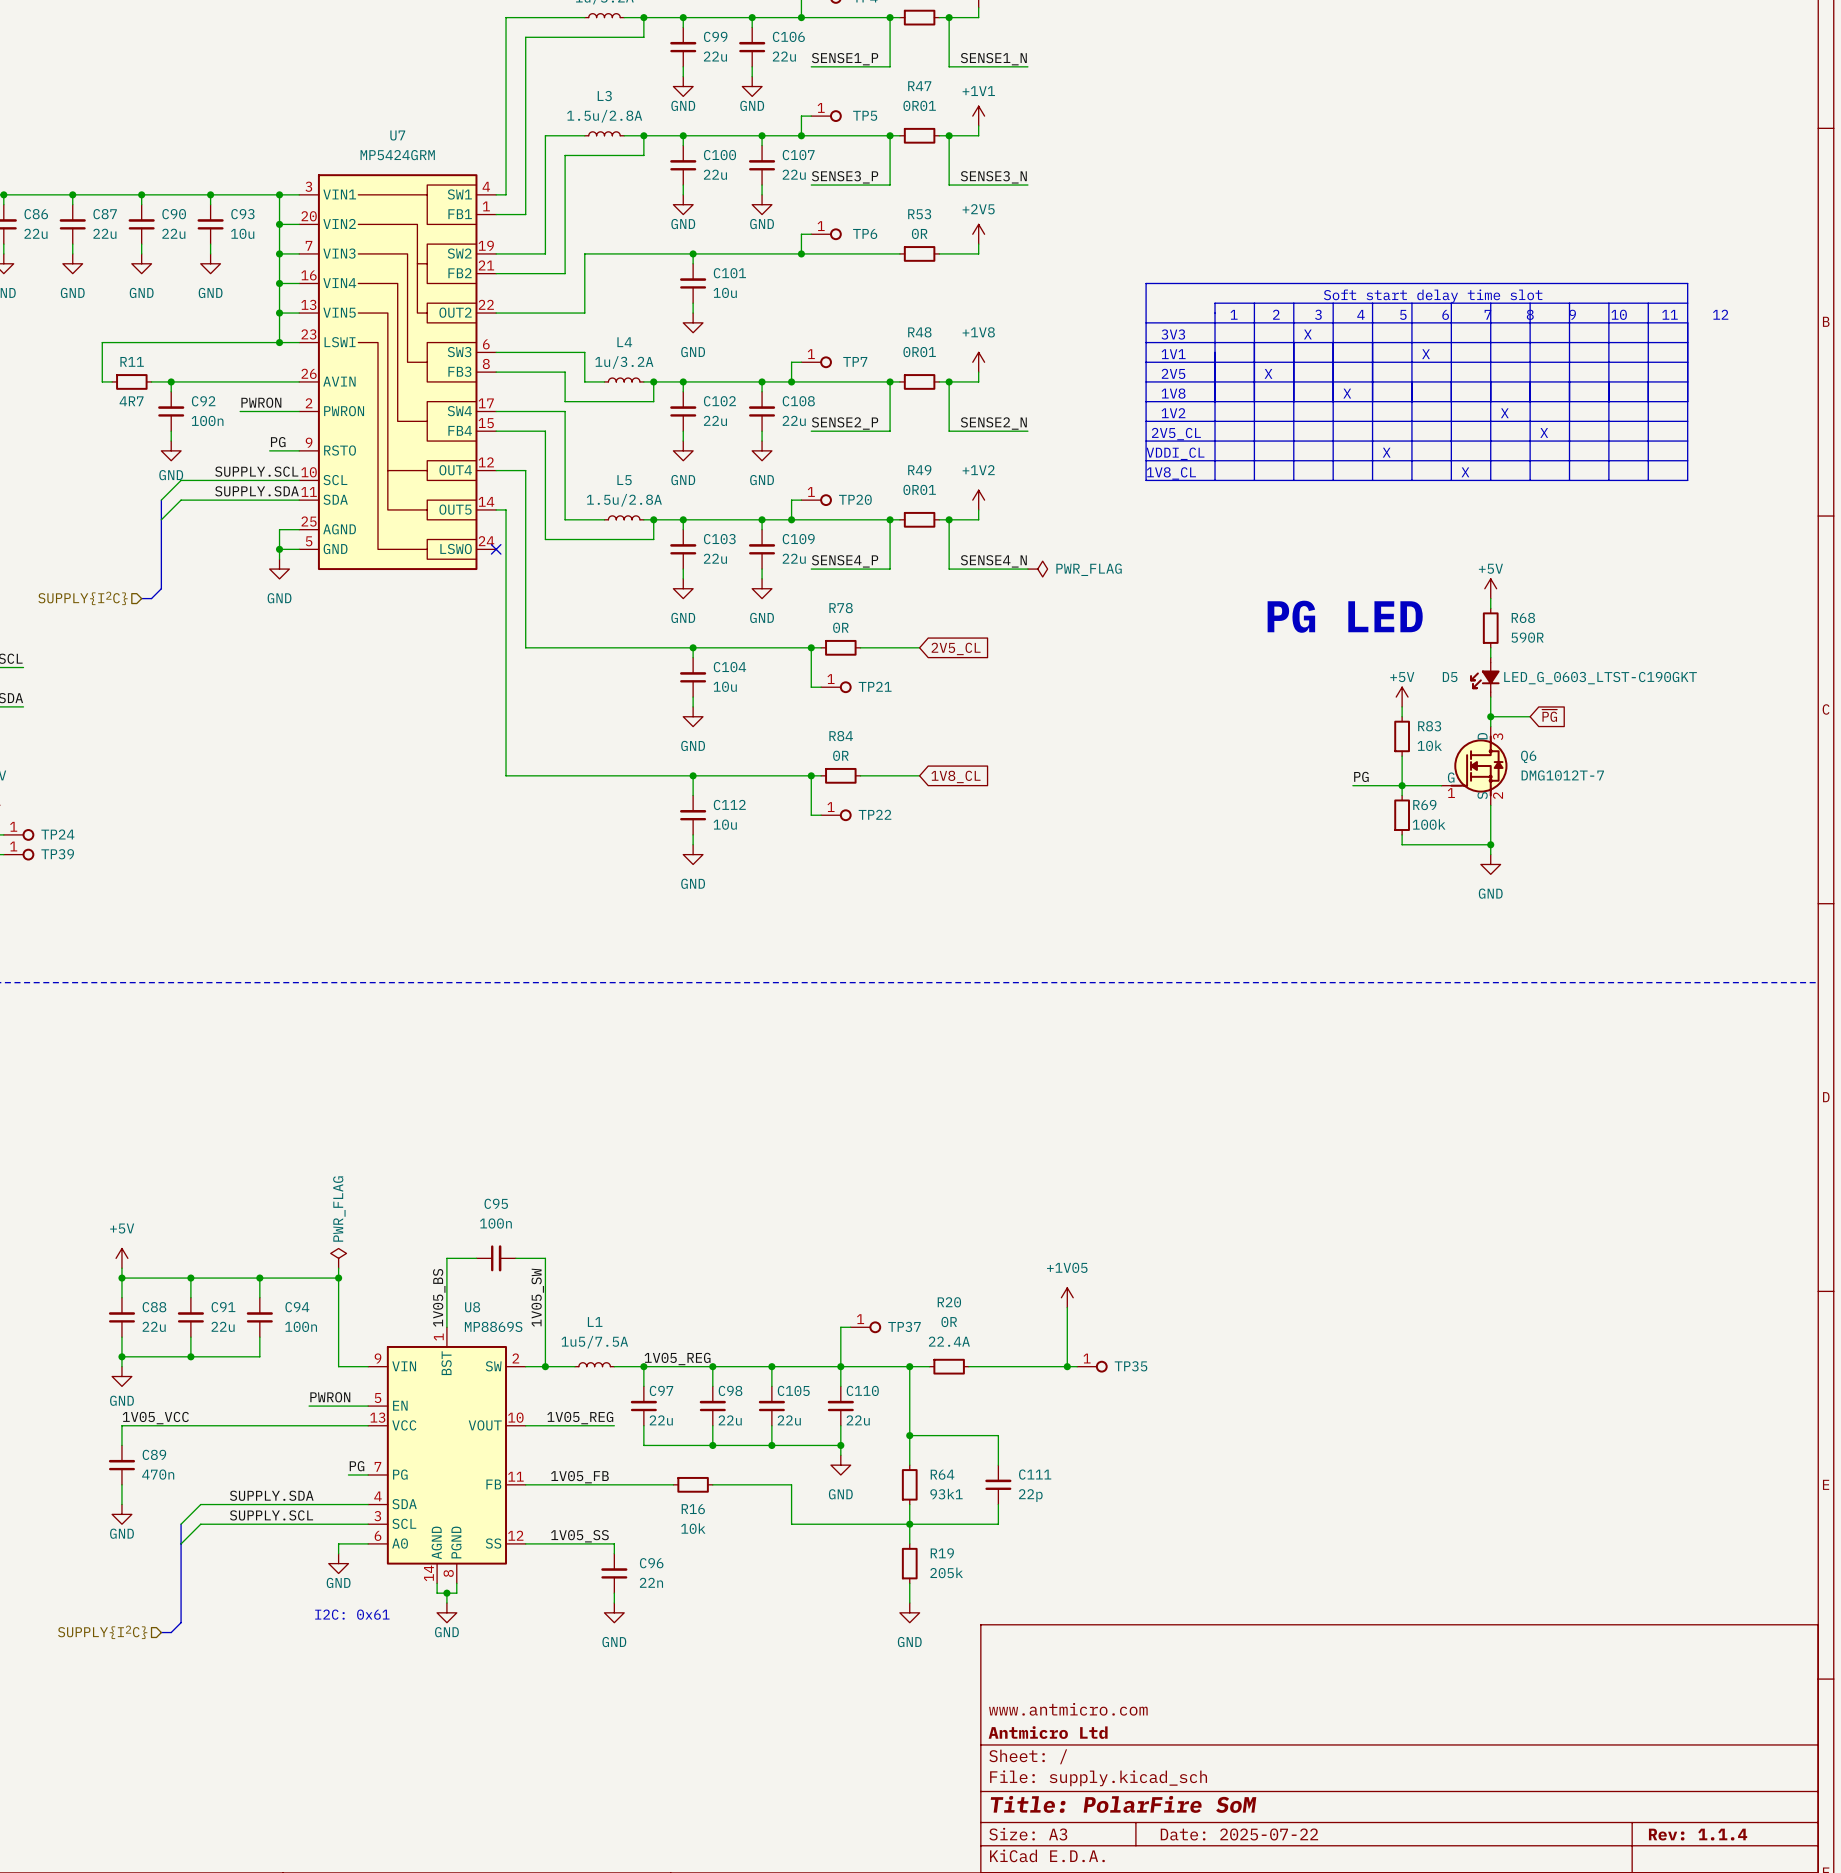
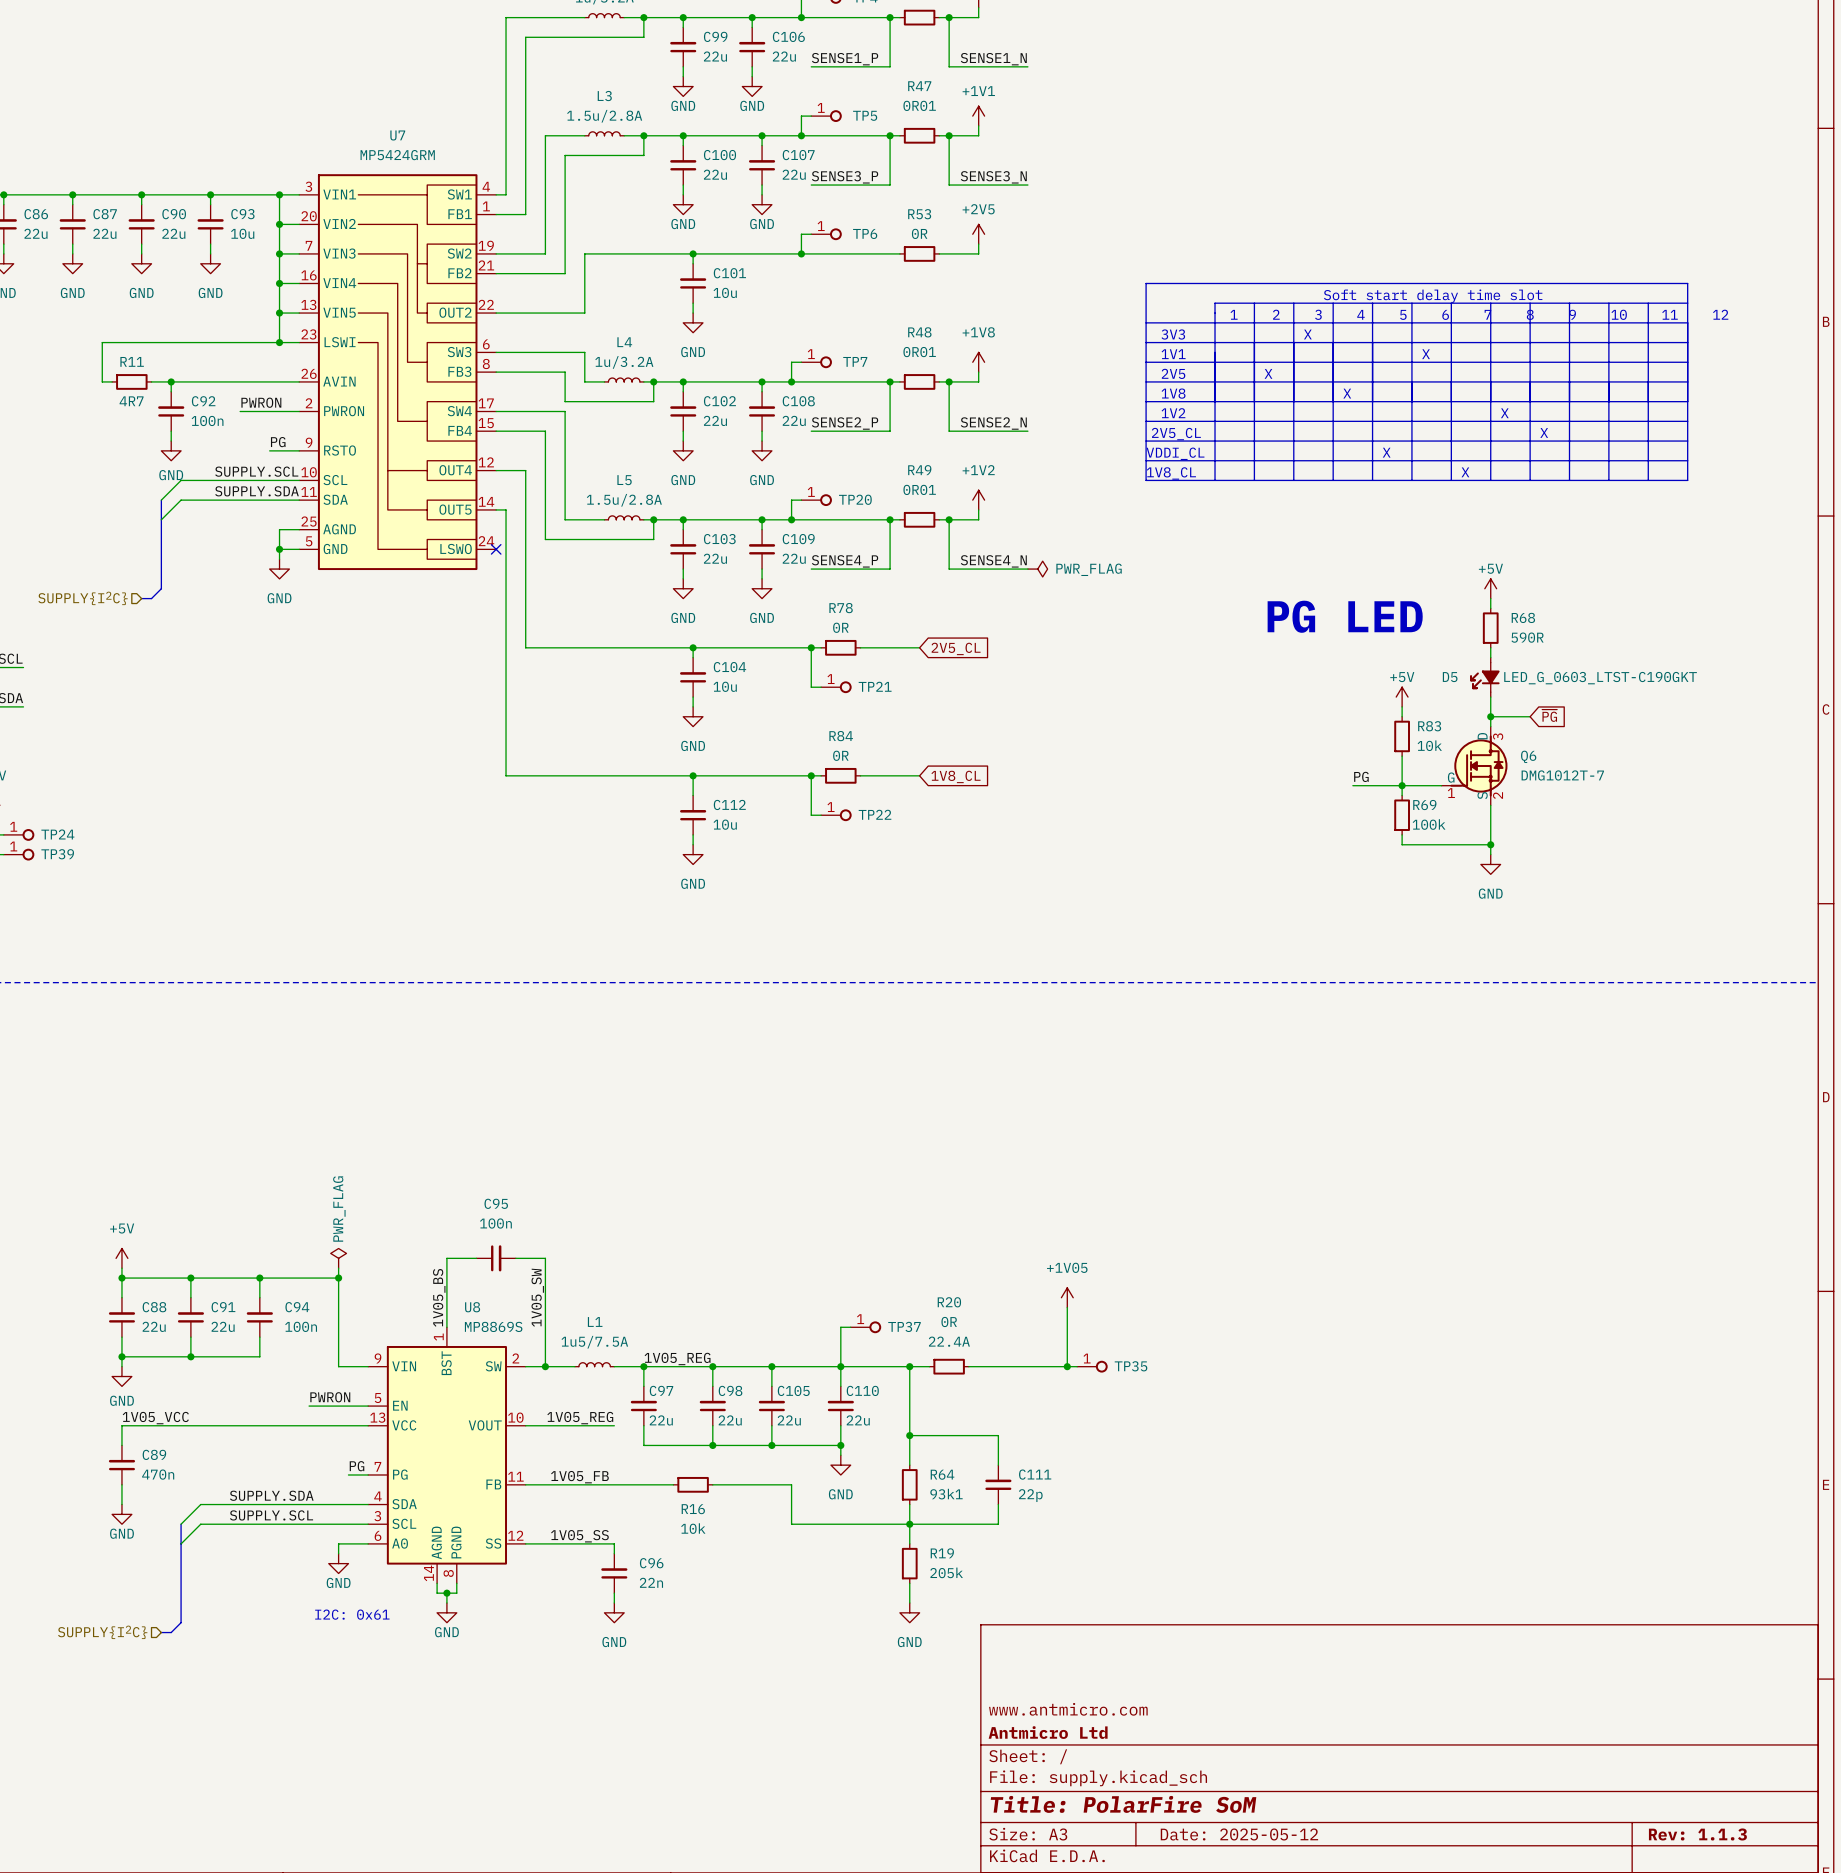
title block: Date: 2025-07-22 (1239, 1834) -> Date: 2025-05-12 (1239, 1834)
title block: Rev: 1.1.4 (1698, 1834) -> Rev: 1.1.3 (1697, 1834)

